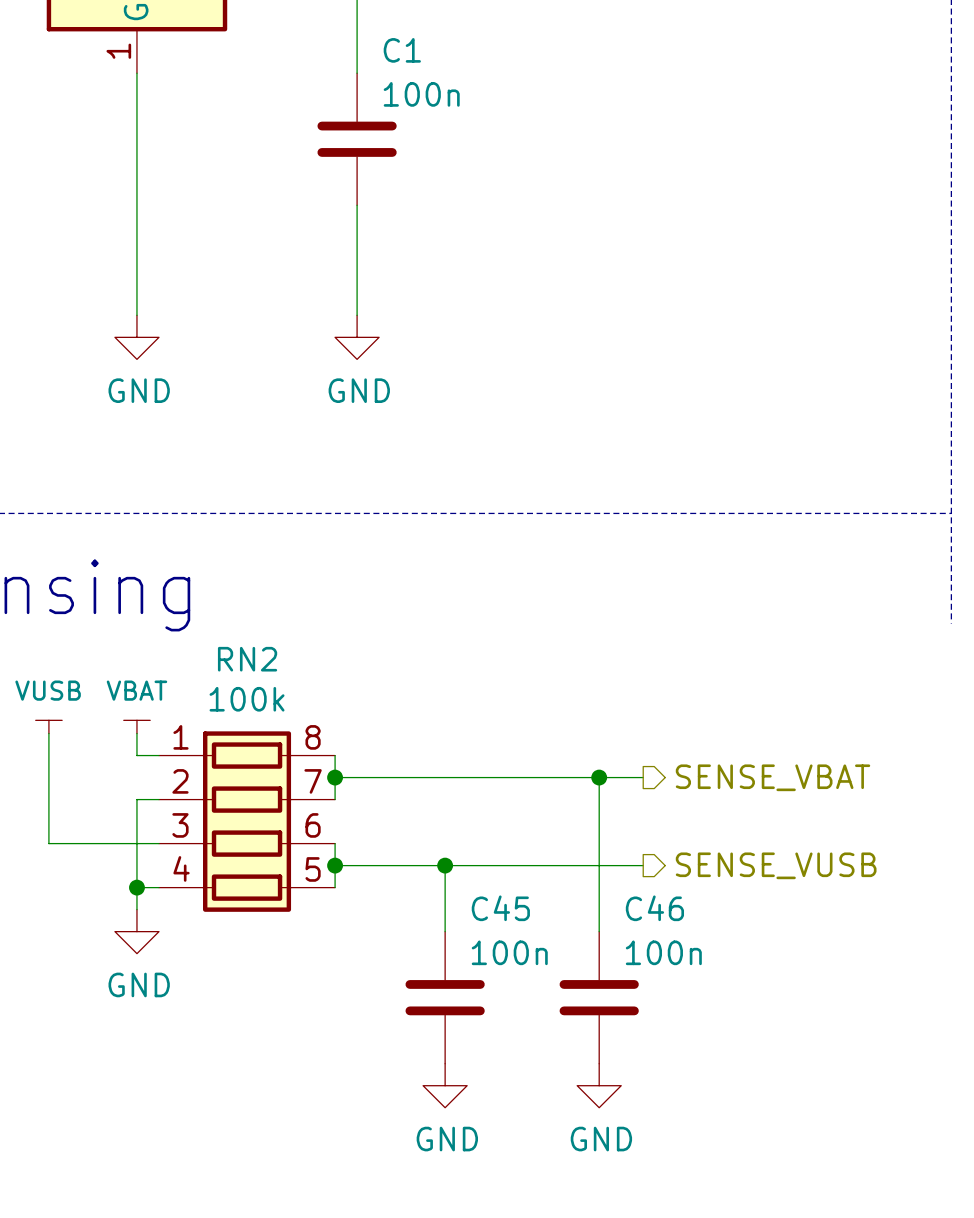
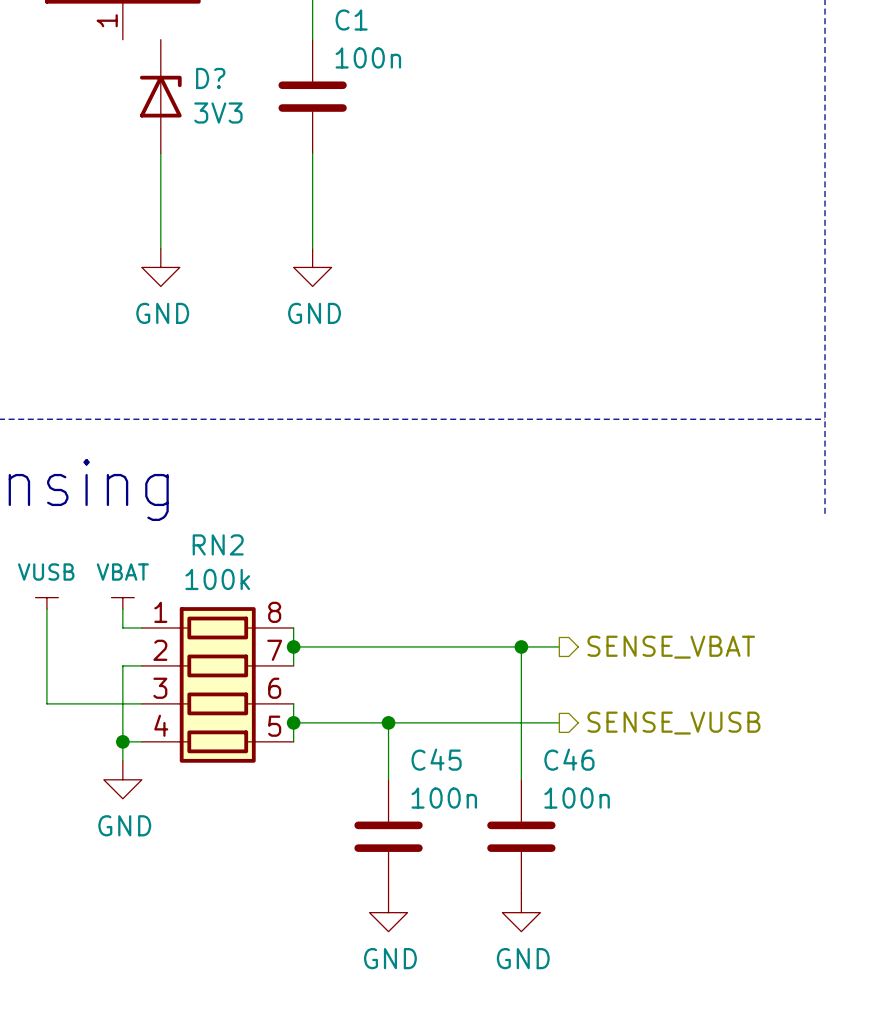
wire: (136, 73) (136, 315) -> none
D?: none -> 3V3 (160, 96)
wire: none -> (160, 153) (160, 248)
power symbol position: GND (136, 337) -> GND (160, 267)

